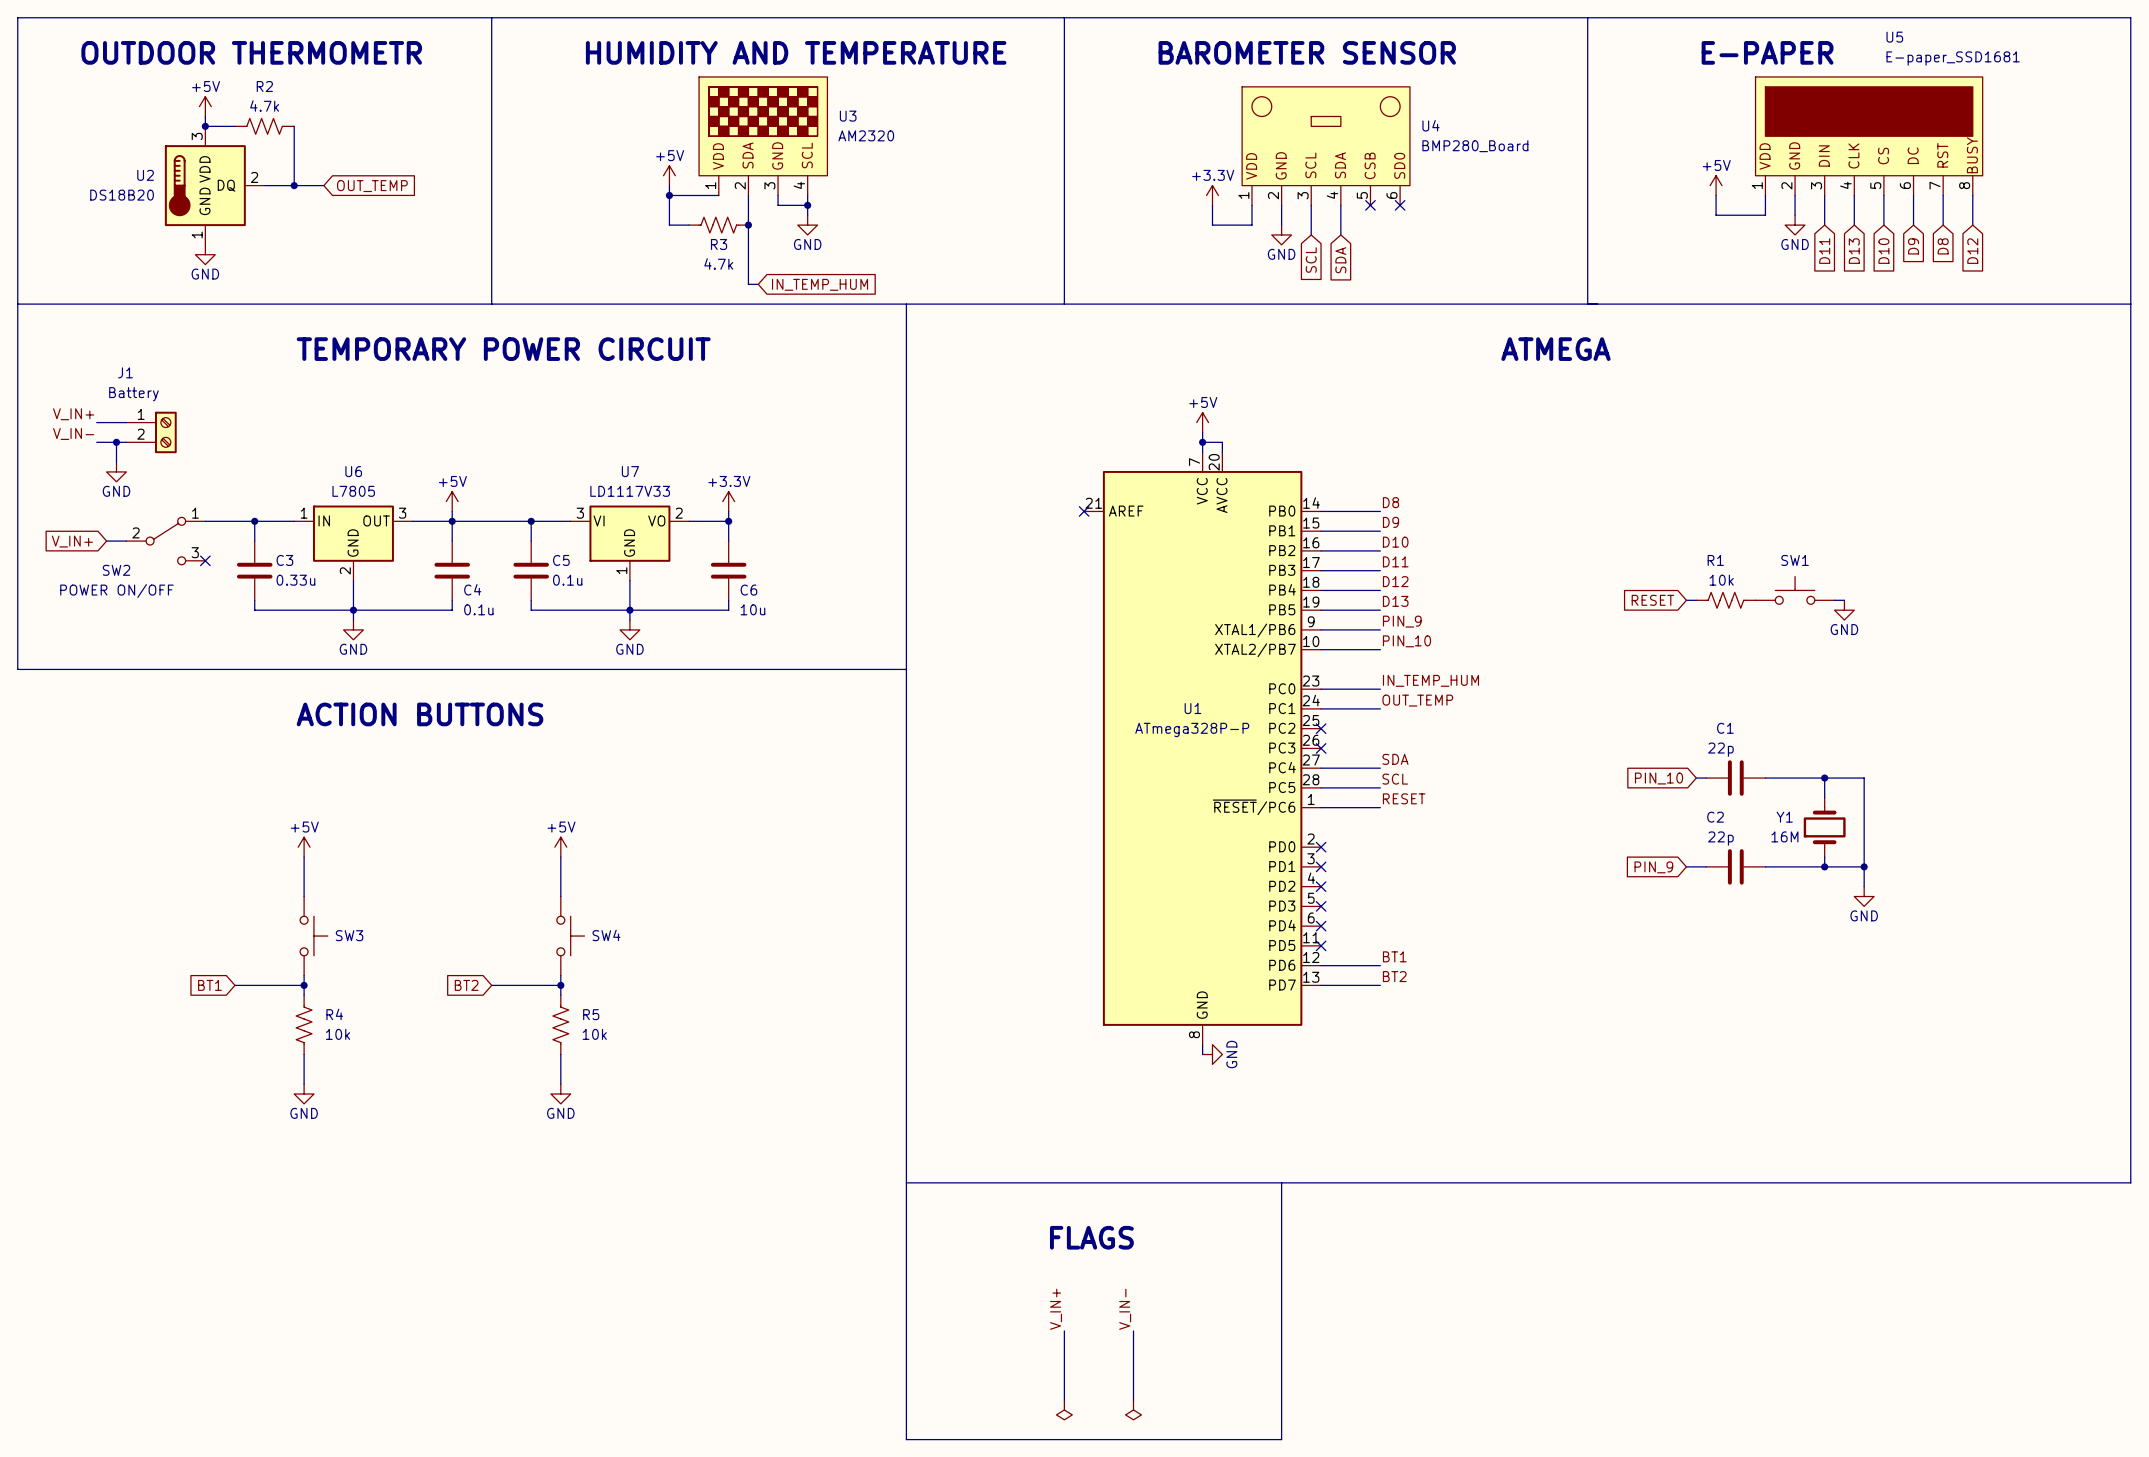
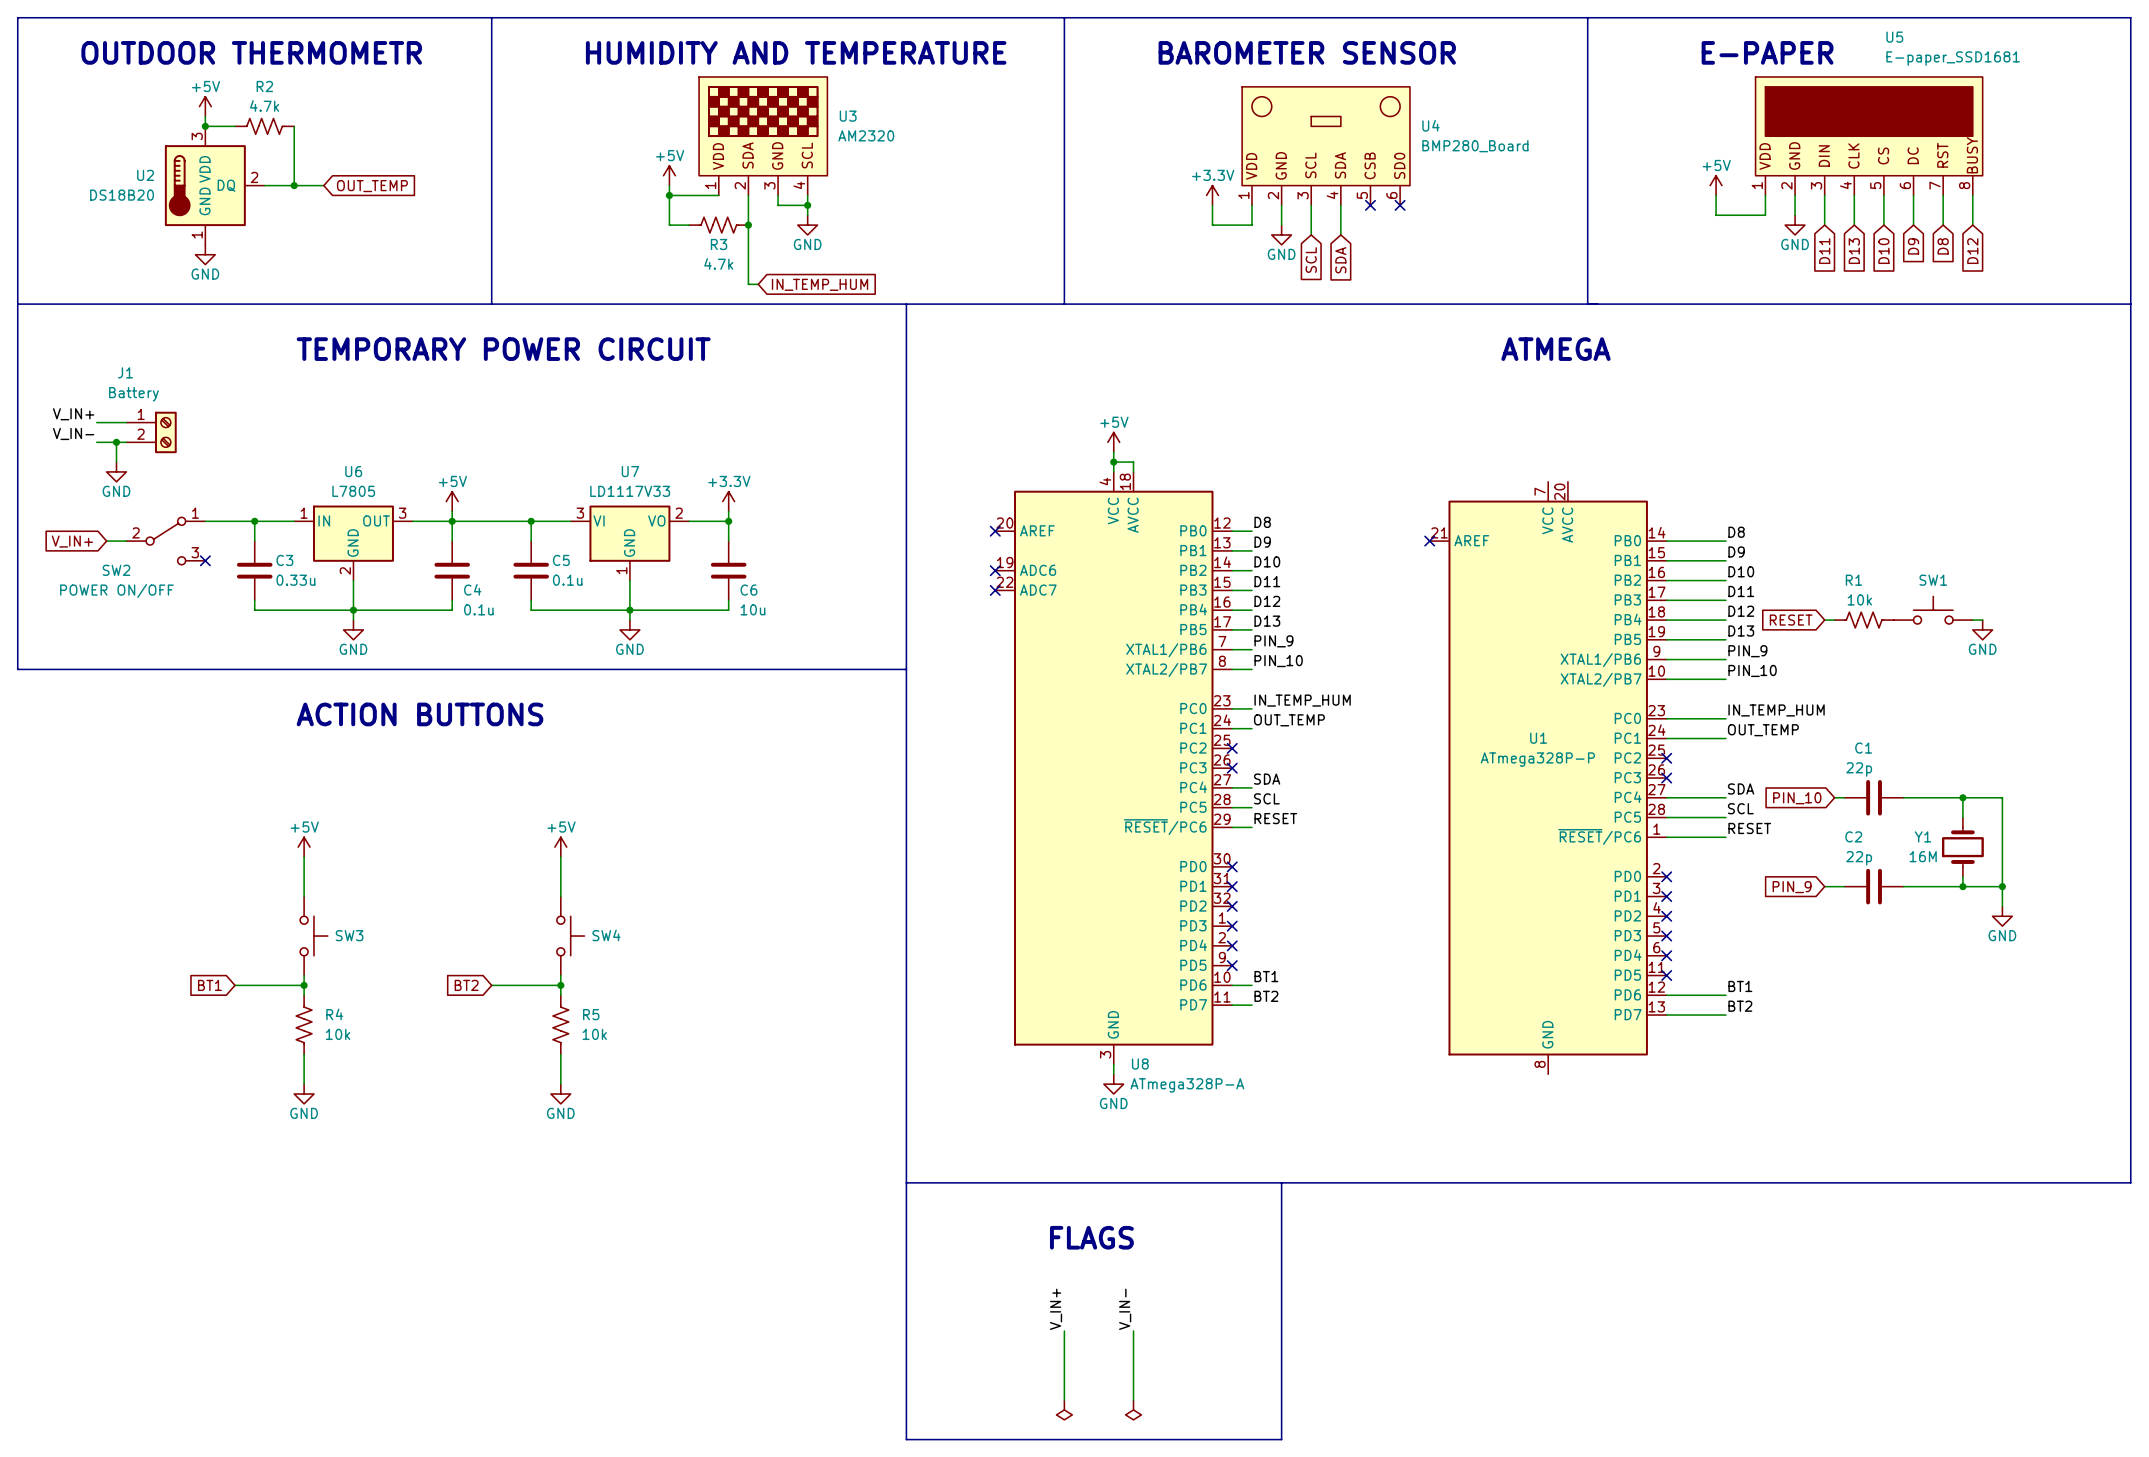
power symbol position: +5V (1202, 422) -> +5V (1113, 442)
wire: (1202, 432) (1202, 452) -> (1113, 452) (1113, 471)
wire: (1202, 442) (1222, 442) (1222, 452) -> (1113, 462) (1133, 462) (1133, 471)
junction: (1202, 442) -> none
junction: none -> (1113, 462)
label position: D8 (1391, 502) -> D8 (1262, 522)
no-connect mark: (1084, 511) -> none
wire: (1321, 511) (1380, 511) -> none
label position: D9 (1391, 522) -> D9 (1262, 542)
no-connect mark: none -> (995, 531)
wire: (1321, 531) (1380, 531) -> none
label: none -> D8 (1736, 532)
no-connect mark: none -> (1429, 541)
wire: none -> (1666, 541) (1725, 541)
label position: D10 (1395, 542) -> D10 (1267, 561)
wire: (1321, 550) (1380, 550) -> none
label: none -> D9 (1736, 552)
wire: none -> (1666, 560) (1725, 560)
label position: D11 (1395, 561) -> D11 (1267, 581)
no-connect mark: none -> (995, 570)
wire: (1321, 570) (1380, 570) -> none
label: none -> D10 (1741, 571)
wire: none -> (1666, 580) (1725, 580)
label position: D12 (1395, 581) -> D12 (1267, 601)
no-connect mark: none -> (995, 590)
wire: (1321, 590) (1380, 590) -> none
SW1 position: (1795, 590) -> (1933, 610)
label: none -> D11 (1741, 591)
global label position: RESET (1652, 600) -> RESET (1791, 620)
wire: none -> (1666, 600) (1686, 600)
R1 position: (1725, 600) -> (1864, 620)
wire: (1834, 600) (1844, 600) -> (1972, 620) (1982, 620)
label position: D13 (1395, 601) -> D13 (1267, 621)
wire: (1321, 610) (1380, 610) -> none
power symbol position: GND (1844, 610) -> GND (1982, 629)
label: none -> D12 (1741, 611)
wire: none -> (1666, 620) (1725, 620)
wire: none -> (1824, 620) (1834, 620)
label position: PIN_9 (1402, 621) -> PIN_9 (1273, 641)
wire: (1321, 629) (1380, 629) -> none
label: none -> D13 (1741, 630)
wire: none -> (1666, 639) (1725, 639)
label position: PIN_10 (1406, 641) -> PIN_10 (1278, 661)
wire: (1321, 649) (1380, 649) -> none
label: none -> PIN_9 (1747, 651)
wire: none -> (1666, 659) (1725, 659)
label: none -> PIN_10 (1752, 670)
wire: none -> (1666, 679) (1725, 679)
label position: IN_TEMP_HUM (1430, 680) -> IN_TEMP_HUM (1302, 700)
wire: (1321, 689) (1380, 689) -> none
label position: OUT_TEMP (1417, 700) -> OUT_TEMP (1289, 720)
wire: (1321, 708) (1380, 708) -> none
label: none -> IN_TEMP_HUM (1776, 710)
wire: none -> (1666, 718) (1725, 718)
no-connect mark: (1321, 728) -> none
label: none -> OUT_TEMP (1763, 730)
wire: none -> (1666, 738) (1725, 738)
U1 position: (1202, 748) -> (1548, 778)
no-connect mark: none -> (1232, 748)
no-connect mark: (1321, 748) -> none
no-connect mark: none -> (1666, 758)
label position: SDA (1395, 759) -> SDA (1267, 779)
U8: none -> ATmega328P-A (1113, 768)
no-connect mark: none -> (1232, 768)
wire: (1321, 768) (1380, 768) -> none
global label position: PIN_10 (1659, 778) -> PIN_10 (1797, 798)
no-connect mark: none -> (1666, 778)
wire: (1696, 778) (1706, 778) -> (1834, 797) (1844, 797)
C1 position: (1735, 778) -> (1874, 797)
wire: (1765, 778) (1864, 778) (1864, 886) -> (1903, 797) (2002, 797) (2002, 906)
wire: (1824, 778) (1824, 797) -> (1962, 797) (1962, 817)
junction: (1824, 778) -> none
label position: SCL (1395, 779) -> SCL (1266, 798)
wire: (1321, 787) (1380, 787) -> none
label: none -> SDA (1741, 788)
wire: none -> (1666, 797) (1725, 797)
junction: none -> (1962, 797)
label position: RESET (1404, 798) -> RESET (1275, 818)
wire: (1321, 807) (1380, 807) -> none
label: none -> SCL (1740, 808)
wire: none -> (1666, 817) (1725, 817)
Y1 position: (1824, 827) -> (1962, 847)
label: none -> RESET (1749, 828)
wire: none -> (1666, 837) (1725, 837)
no-connect mark: (1321, 847) -> none
wire: (1824, 857) (1824, 866) -> (1962, 876) (1962, 886)
no-connect mark: none -> (1232, 866)
no-connect mark: (1321, 866) -> none
wire: (1686, 866) (1706, 866) -> (1824, 886) (1844, 886)
C2 position: (1735, 866) -> (1874, 886)
wire: (1765, 866) (1864, 866) -> (1903, 886) (2002, 886)
junction: (1824, 866) -> none
junction: (1864, 866) -> none
global label position: PIN_9 (1653, 867) -> PIN_9 (1792, 887)
no-connect mark: none -> (1666, 876)
no-connect mark: none -> (1232, 886)
no-connect mark: (1321, 886) -> none
junction: none -> (1962, 886)
junction: none -> (2002, 886)
no-connect mark: none -> (1666, 896)
power symbol position: GND (1864, 896) -> GND (2002, 916)
no-connect mark: none -> (1232, 906)
no-connect mark: (1321, 906) -> none
no-connect mark: none -> (1666, 916)
no-connect mark: none -> (1232, 926)
no-connect mark: (1321, 926) -> none
no-connect mark: none -> (1666, 936)
no-connect mark: none -> (1232, 945)
no-connect mark: (1321, 945) -> none
no-connect mark: none -> (1666, 955)
label position: BT1 (1394, 956) -> BT1 (1266, 976)
no-connect mark: none -> (1232, 965)
wire: (1321, 965) (1380, 965) -> none
no-connect mark: none -> (1666, 975)
label position: BT2 (1394, 976) -> BT2 (1266, 996)
wire: (1321, 985) (1380, 985) -> none
label: none -> BT1 (1740, 986)
wire: none -> (1666, 995) (1725, 995)
label: none -> BT2 (1740, 1006)
wire: none -> (1666, 1015) (1725, 1015)
wire: (1202, 1044) (1202, 1054) -> (1113, 1064) (1113, 1074)
power symbol rotation: 0° (1212, 1054) -> 90° clockwise (1113, 1084)
power symbol position: GND (1212, 1054) -> GND (1113, 1084)

